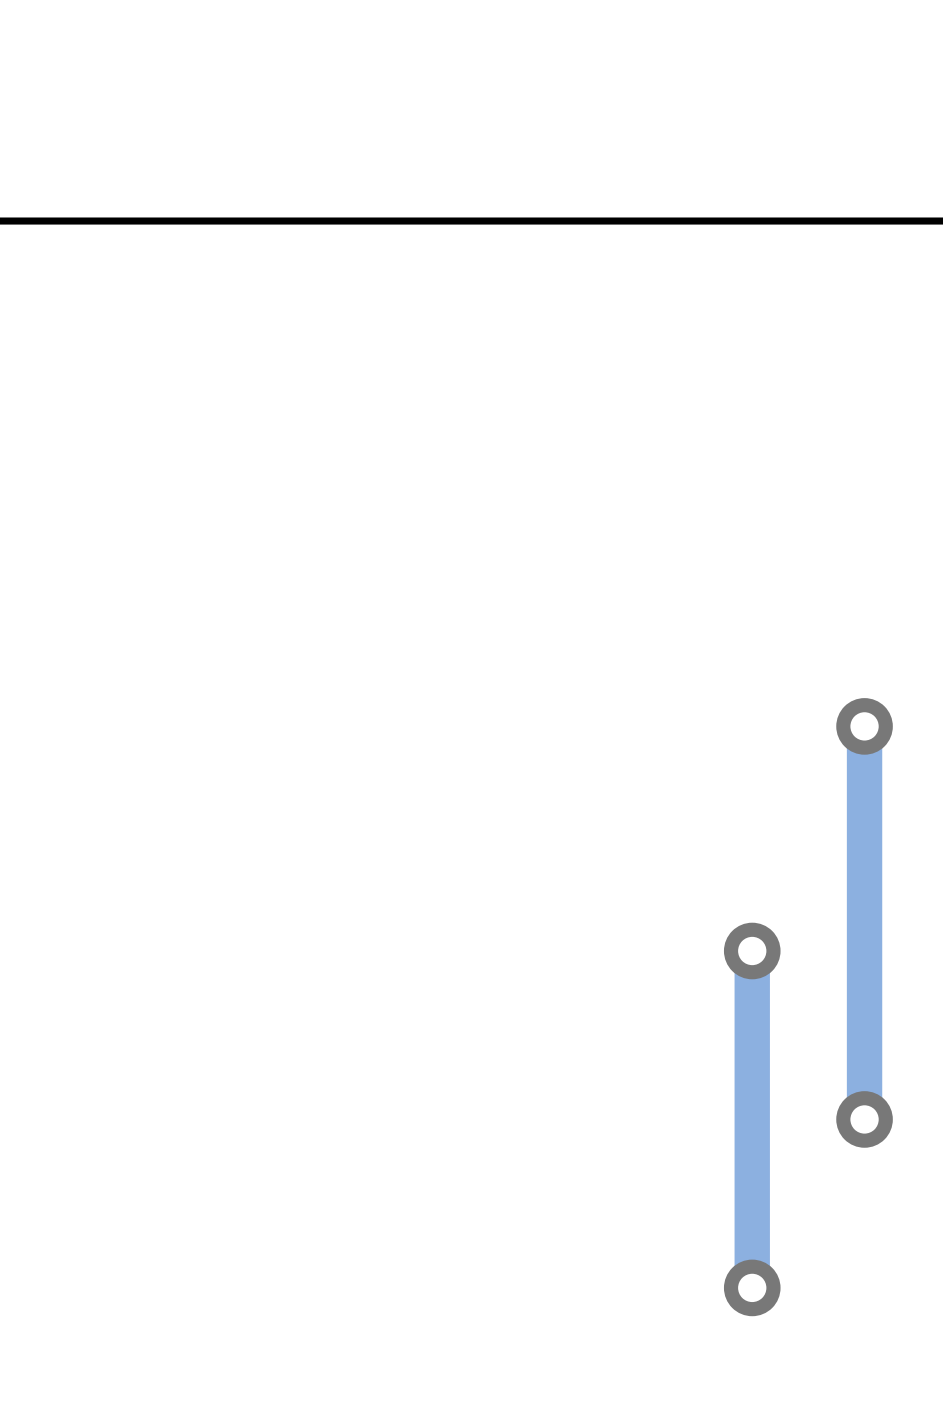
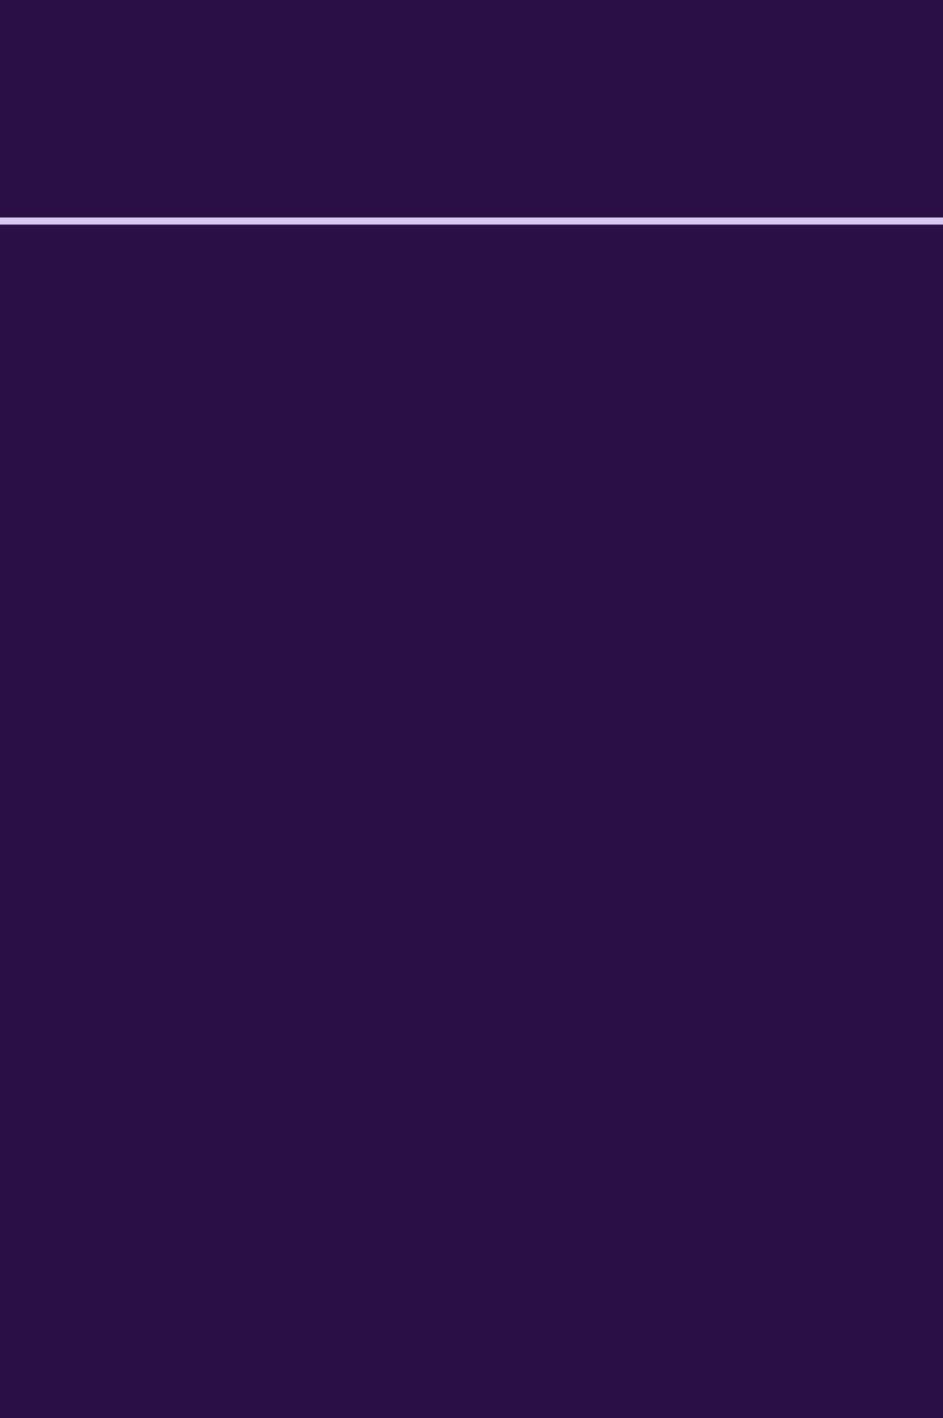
track: (864, 726) (864, 1119) -> none
via: (864, 726) -> none
track: (752, 951) (752, 1287) -> none
via: (752, 951) -> none
via: (864, 1119) -> none
via: (752, 1287) -> none

